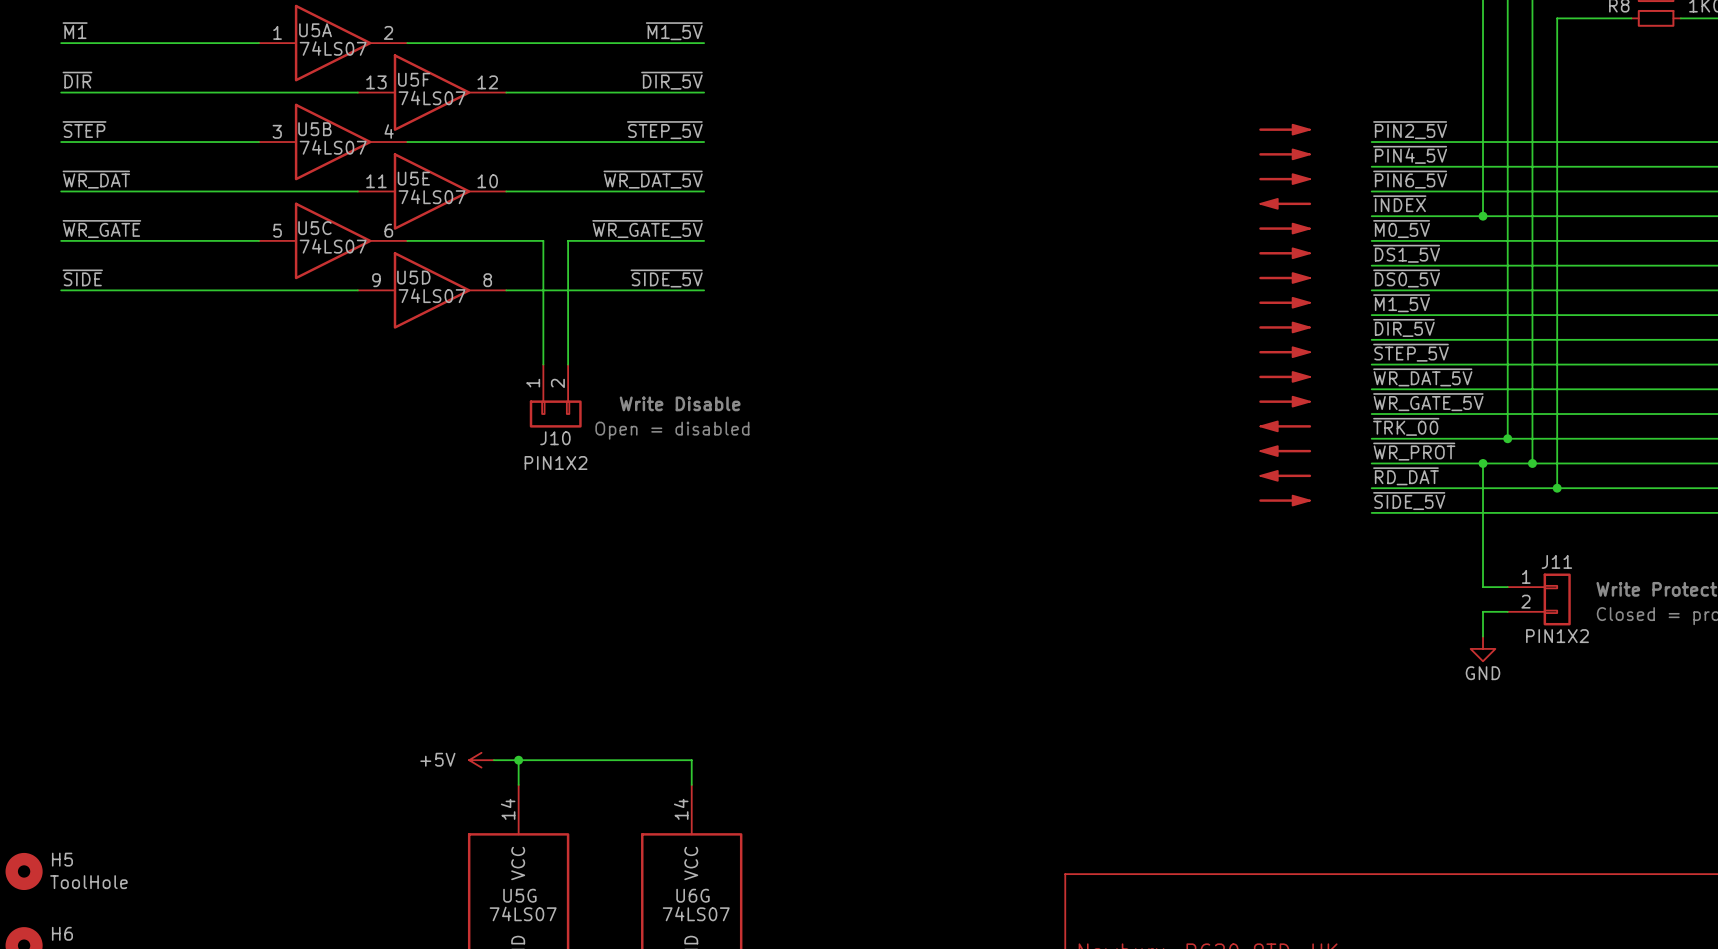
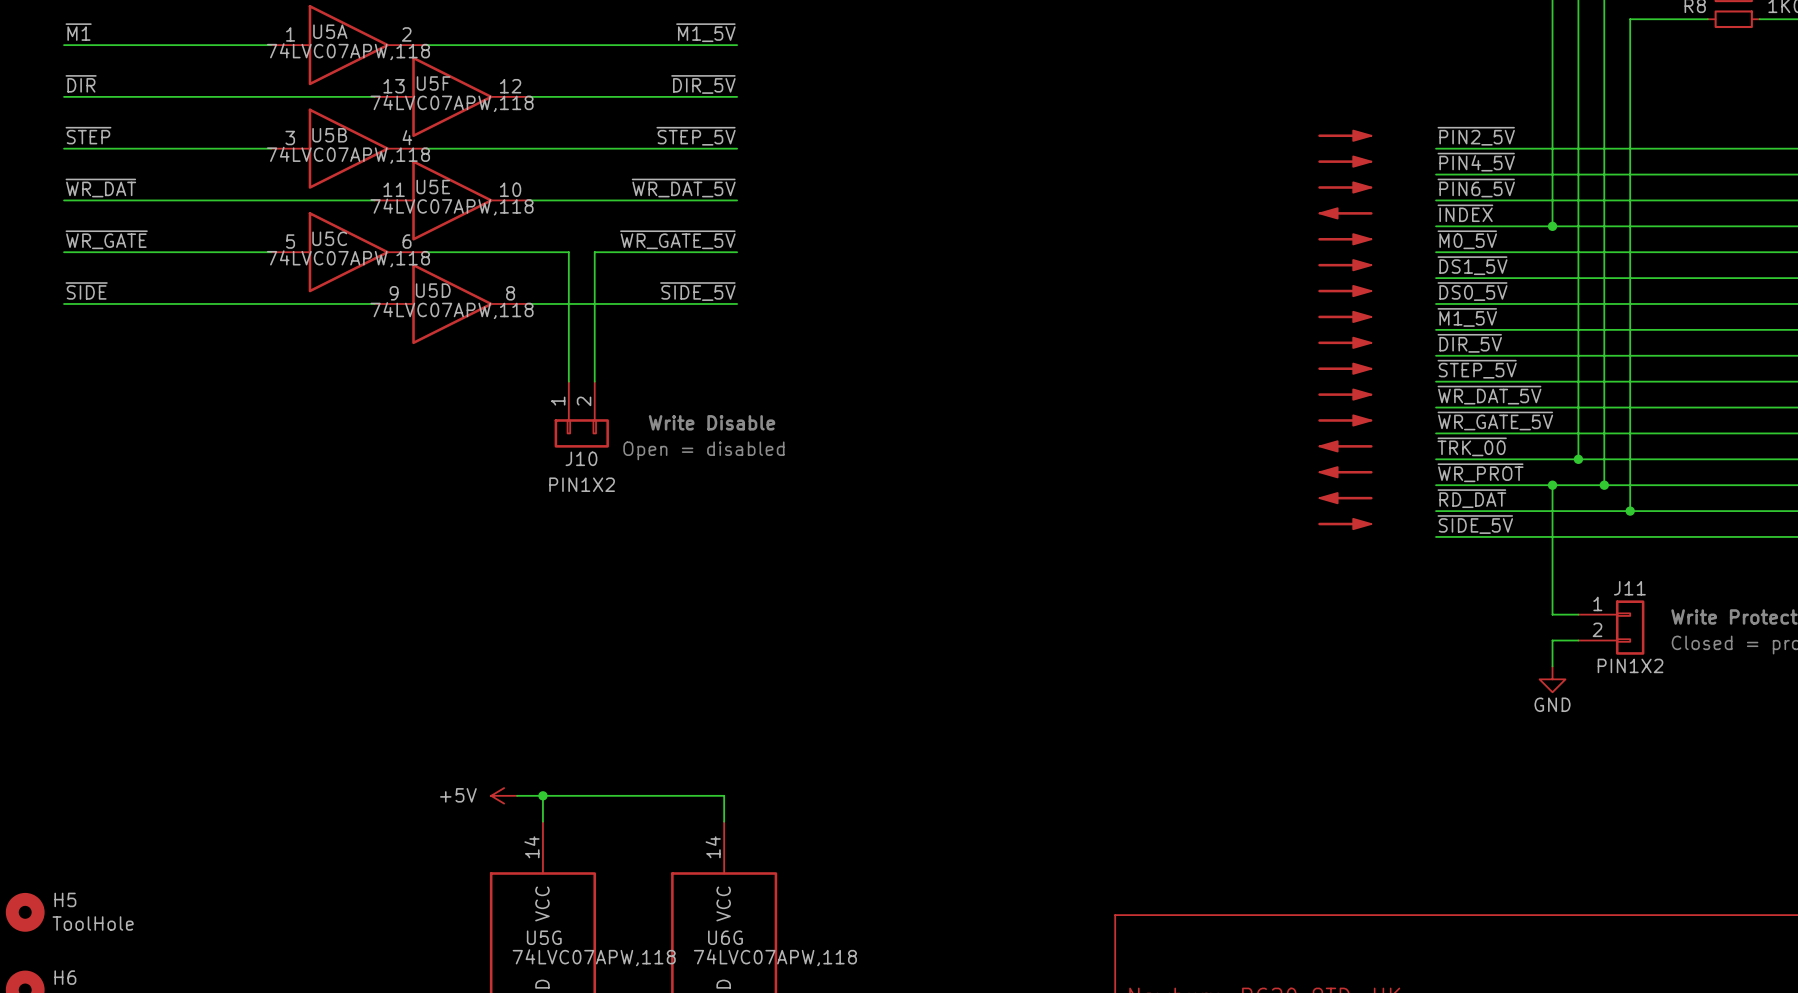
U5A value: 74LS07 (333, 48) -> 74LVC07APW,118 (348, 51)
U5F value: 74LS07 (432, 97) -> 74LVC07APW,118 (452, 103)
U5B value: 74LS07 (333, 147) -> 74LVC07APW,118 (348, 155)
U5E value: 74LS07 (432, 196) -> 74LVC07APW,118 (452, 207)
U5C value: 74LS07 (333, 246) -> 74LVC07APW,118 (348, 258)
U5D value: 74LS07 (432, 295) -> 74LVC07APW,118 (452, 310)
U5G value: 74LS07 (523, 913) -> 74LVC07APW,118 (594, 957)
U6G value: 74LS07 (696, 913) -> 74LVC07APW,118 (775, 957)

